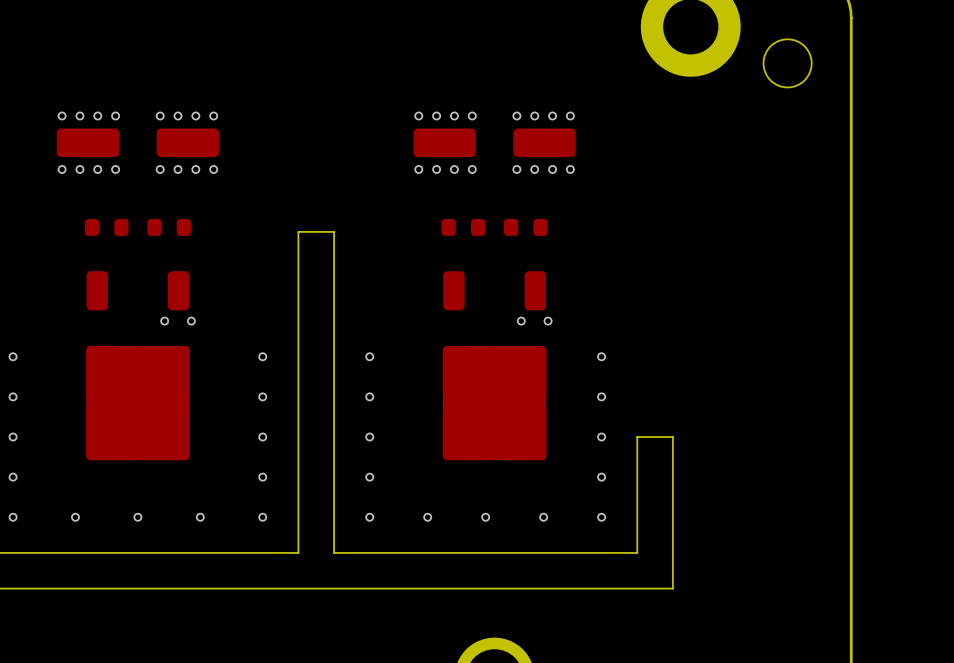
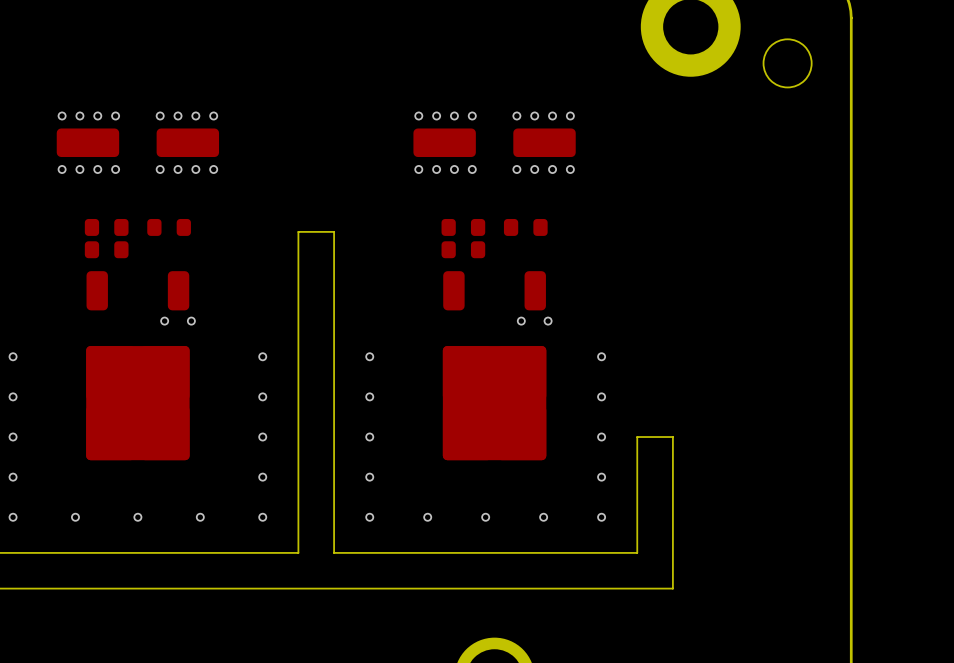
part: none -> (106, 249)
part: none -> (463, 249)

